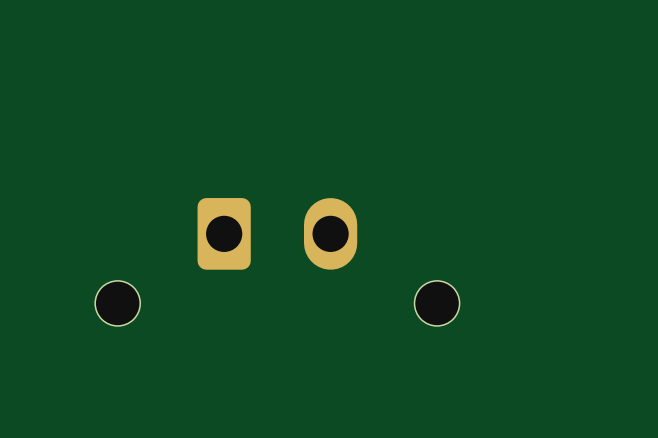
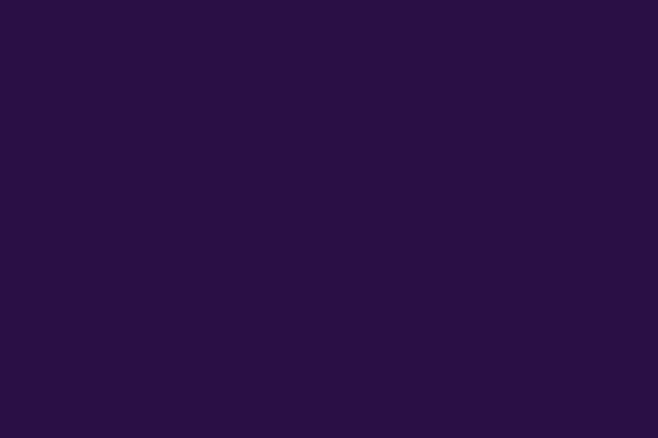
part: (277, 262) -> none

